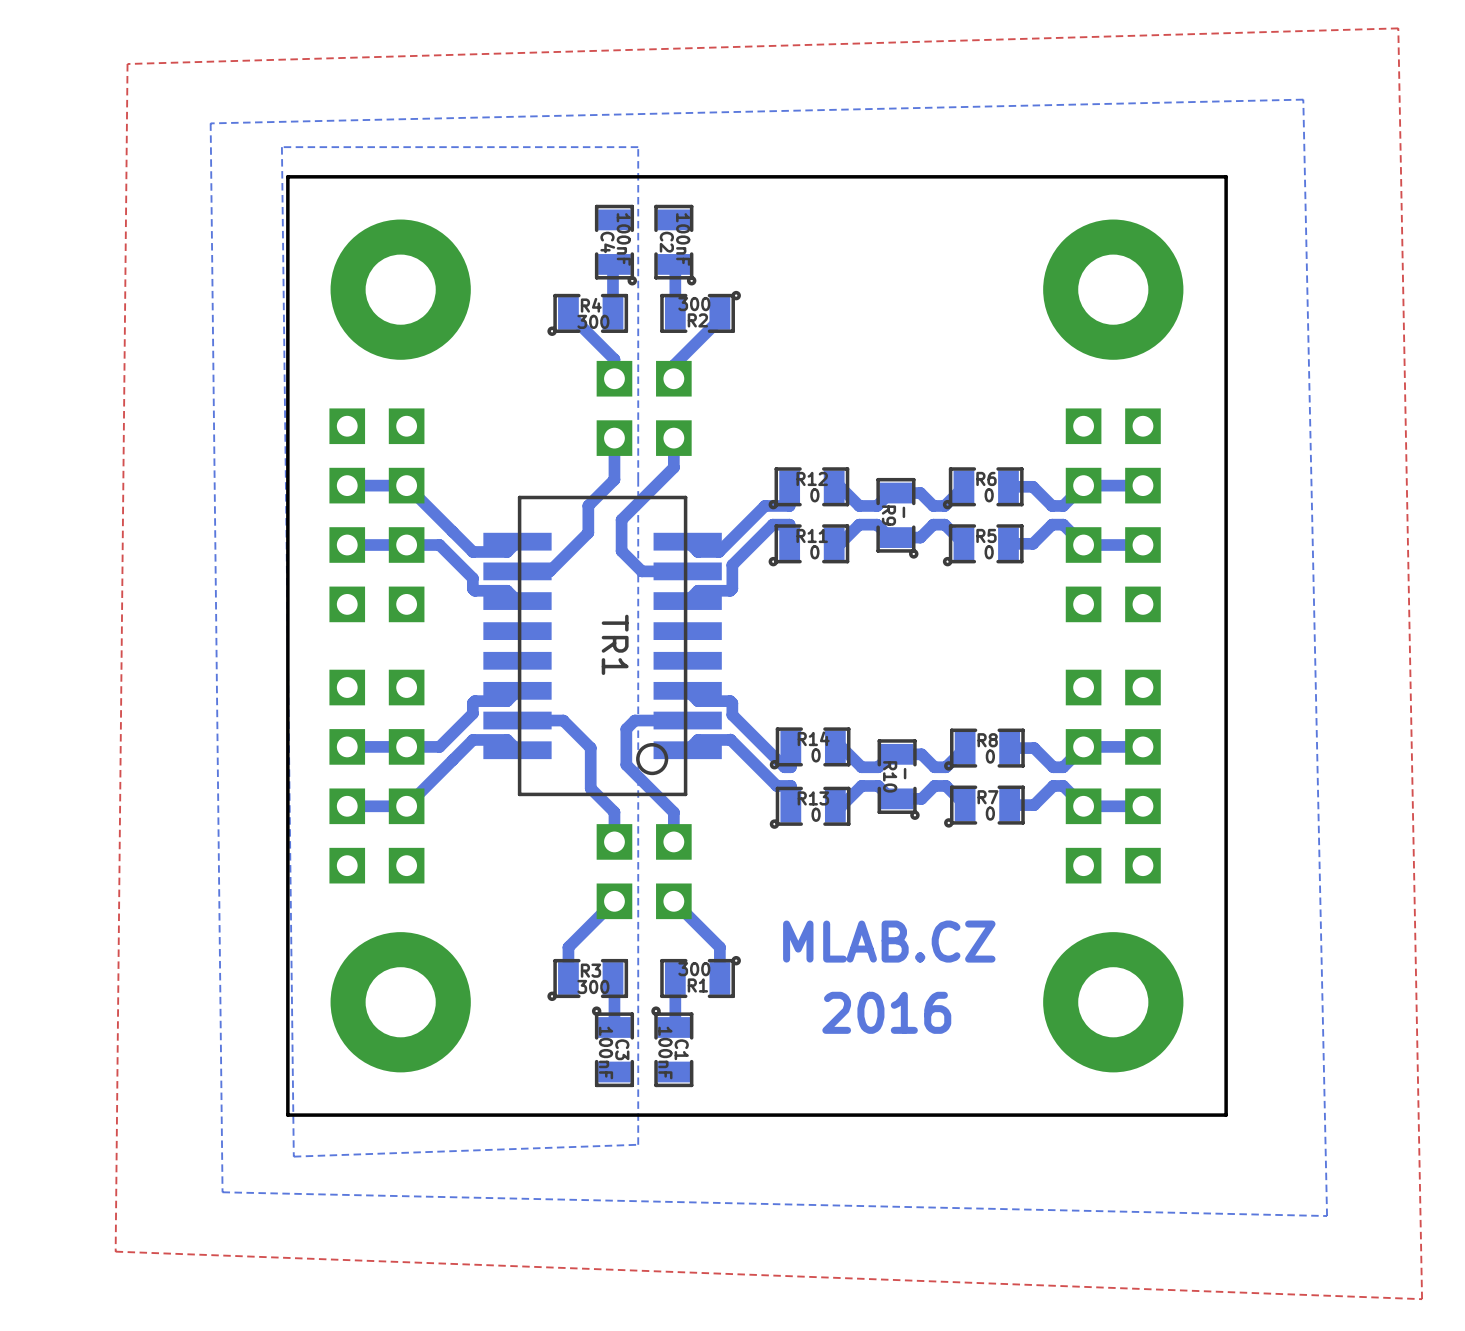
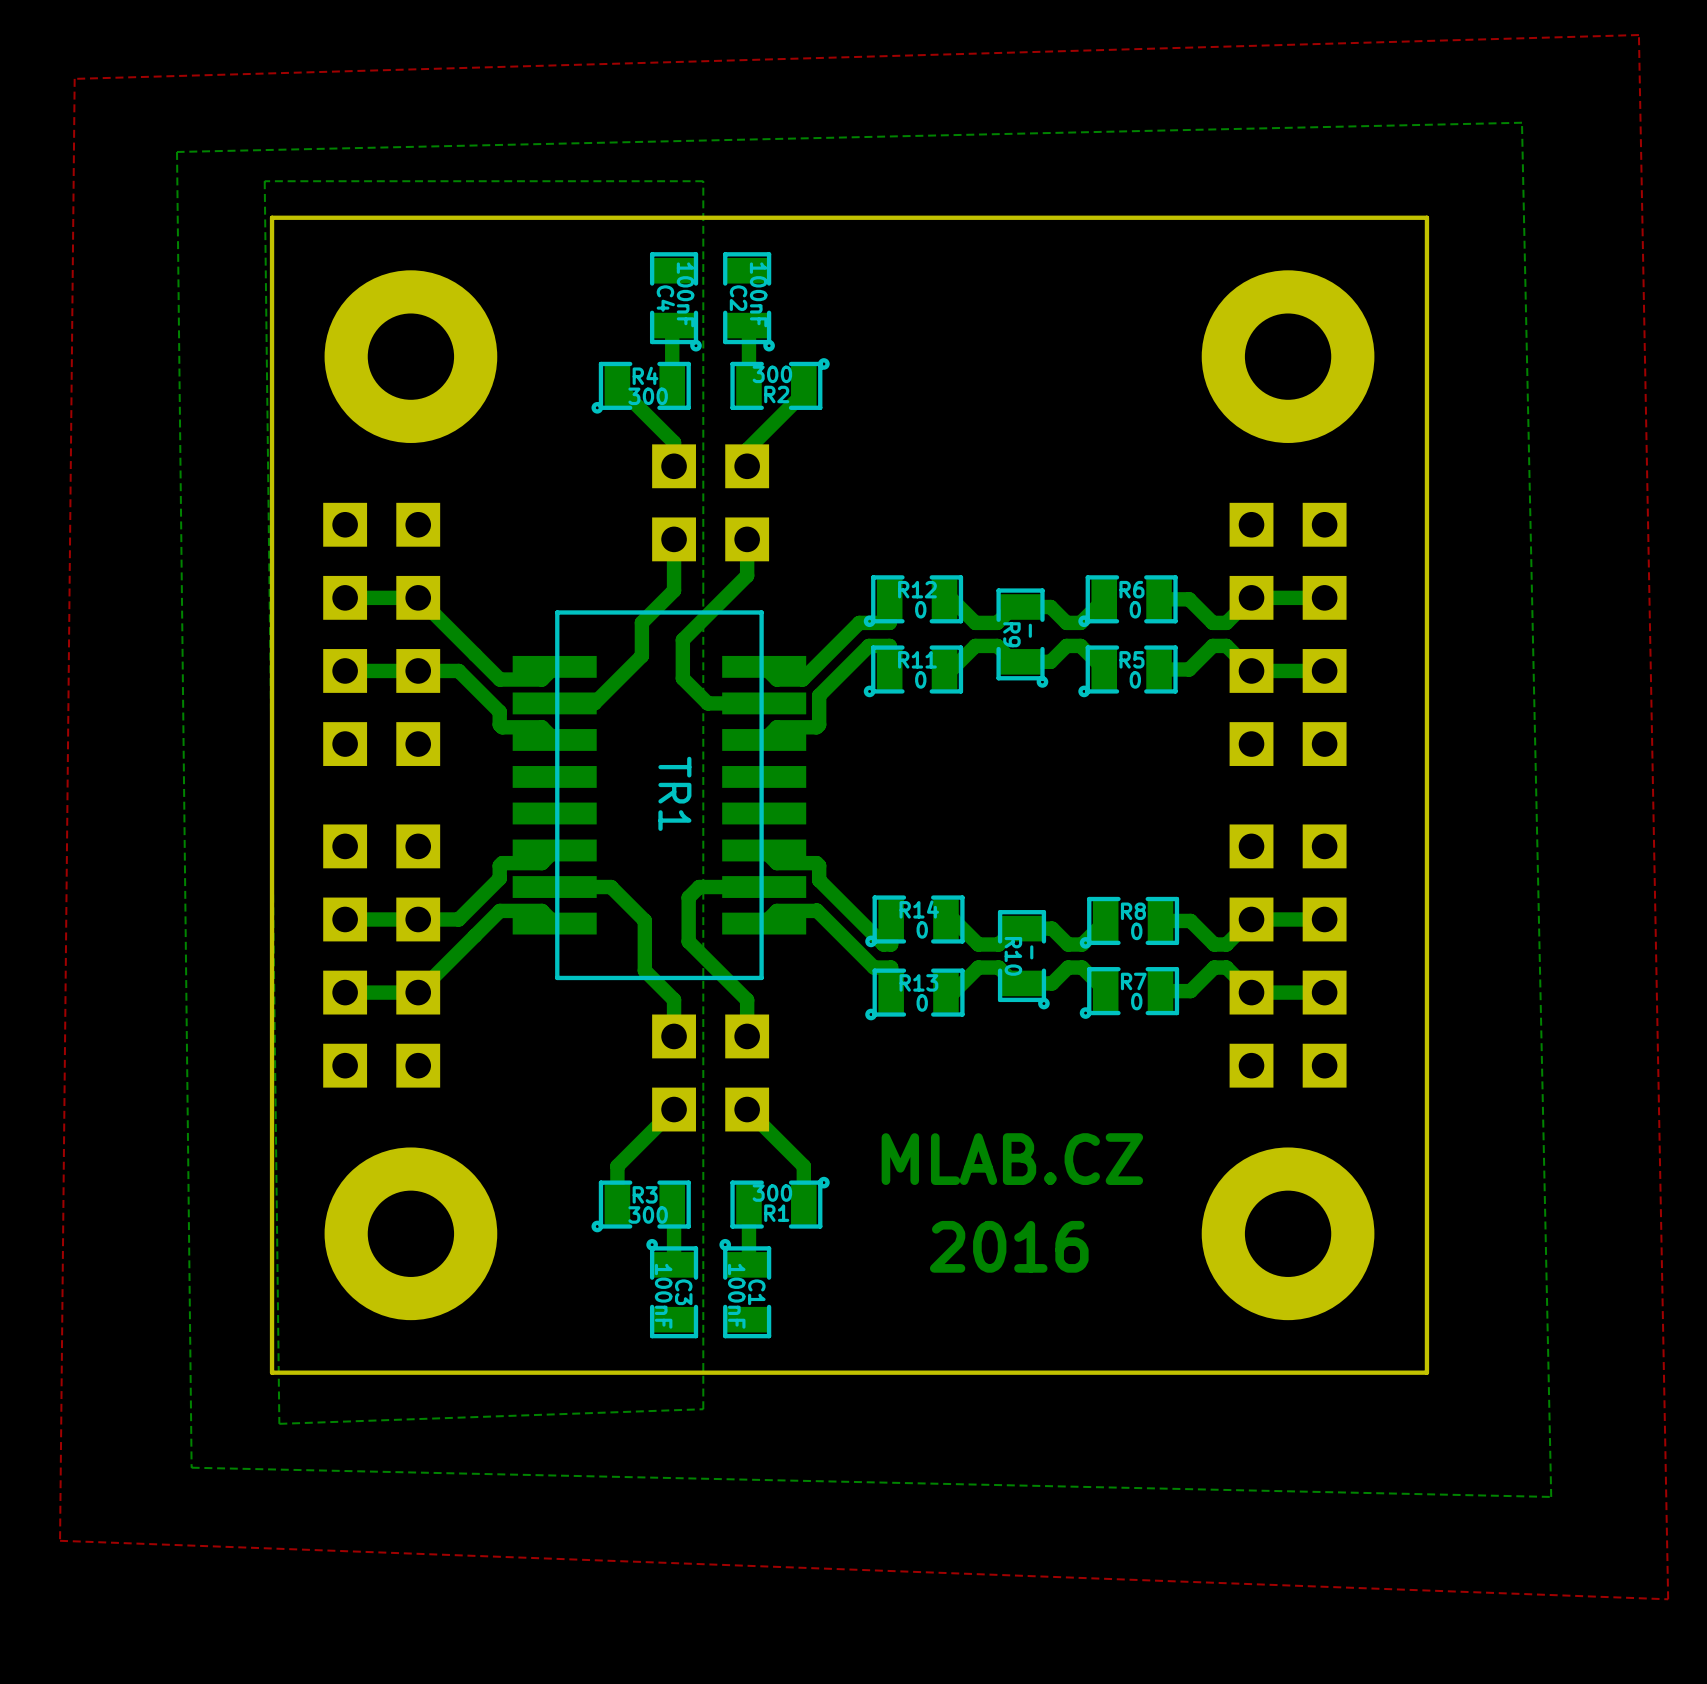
TR1 footprint: [483, 495, 722, 797] -> [512, 610, 807, 981]

